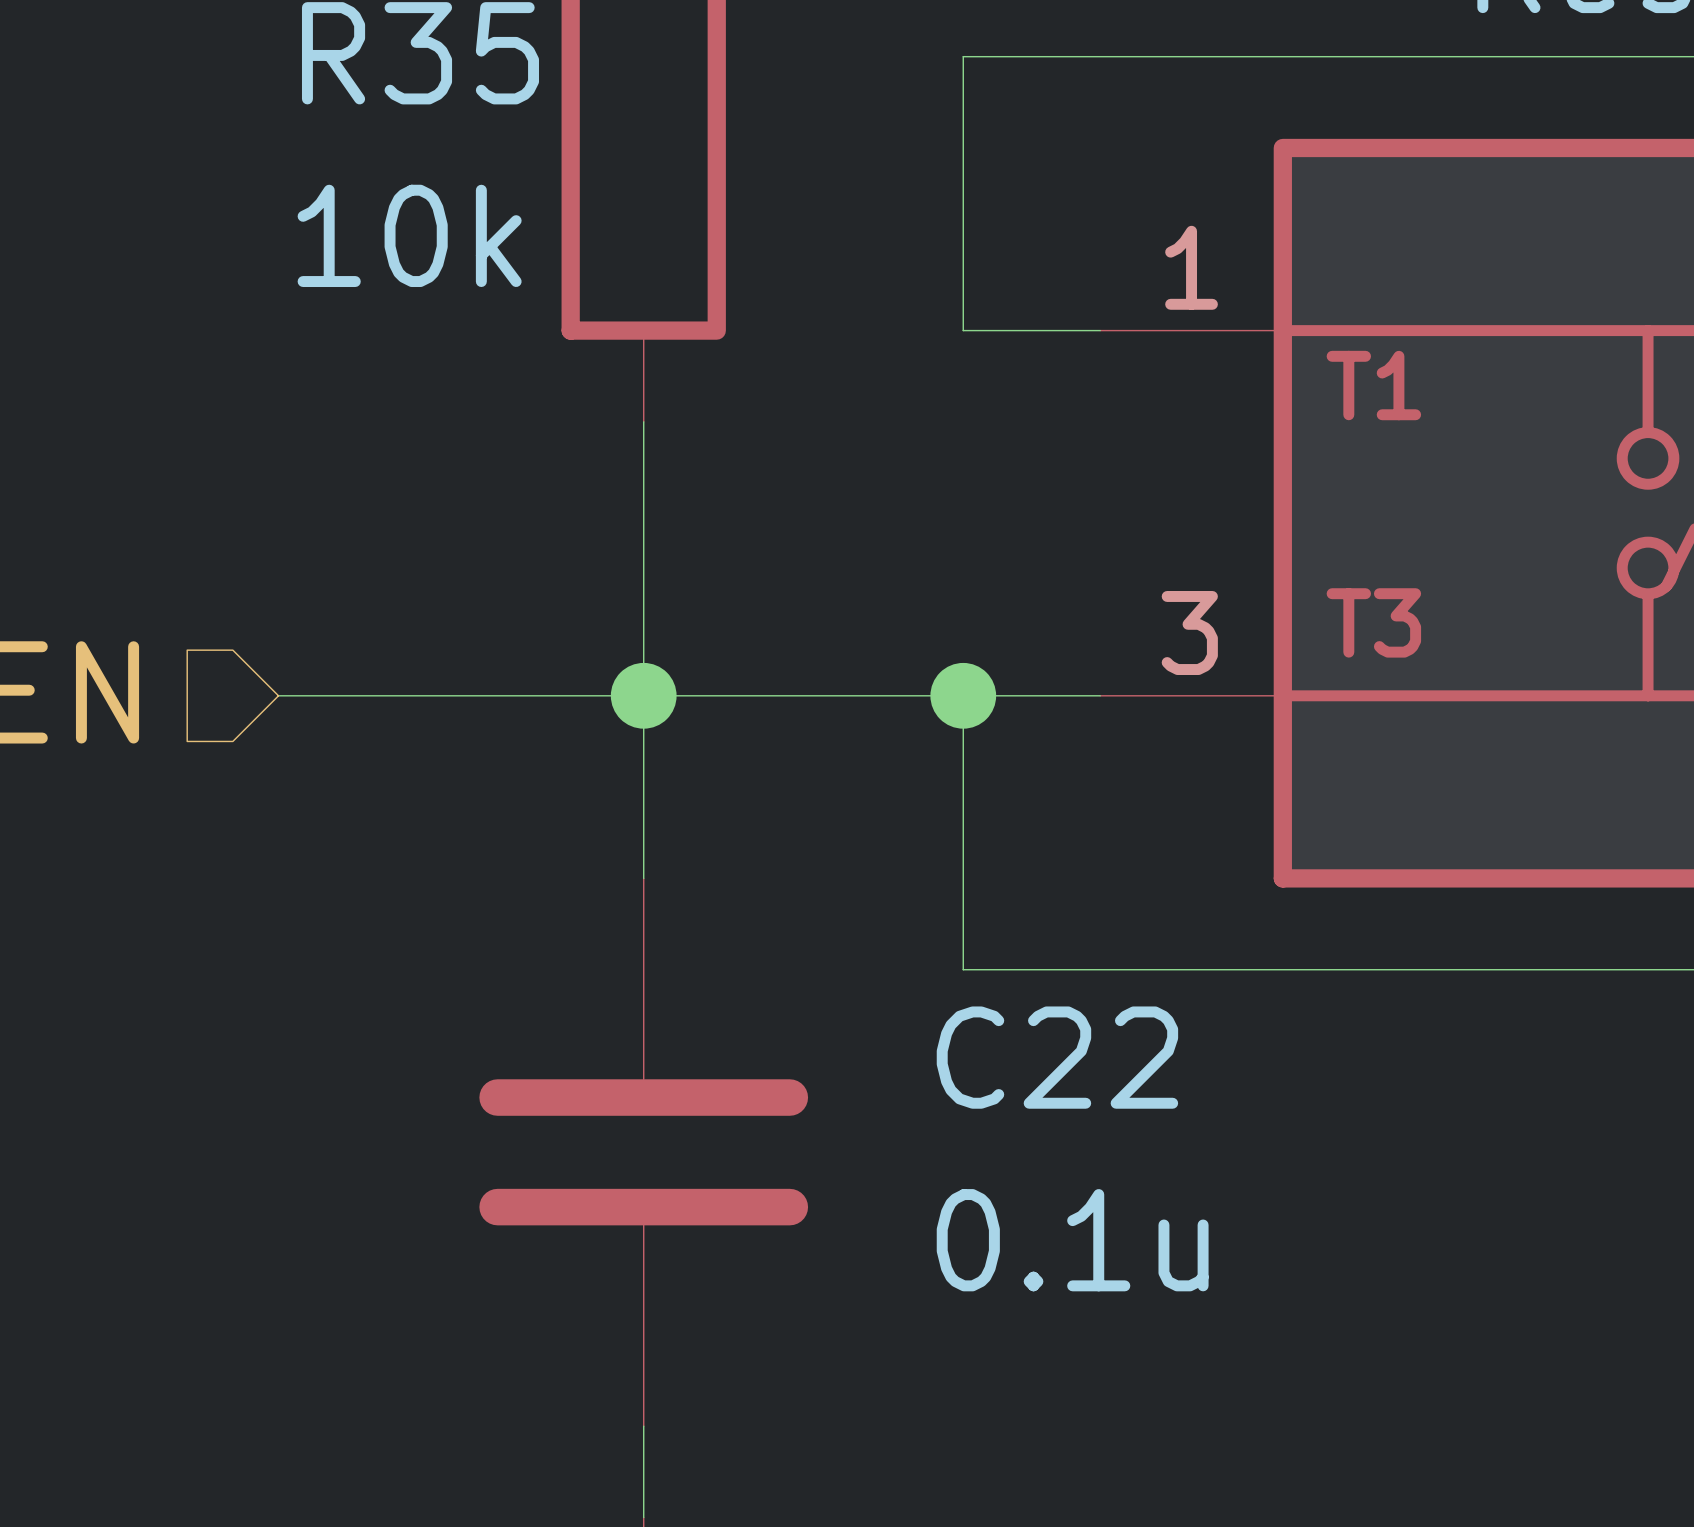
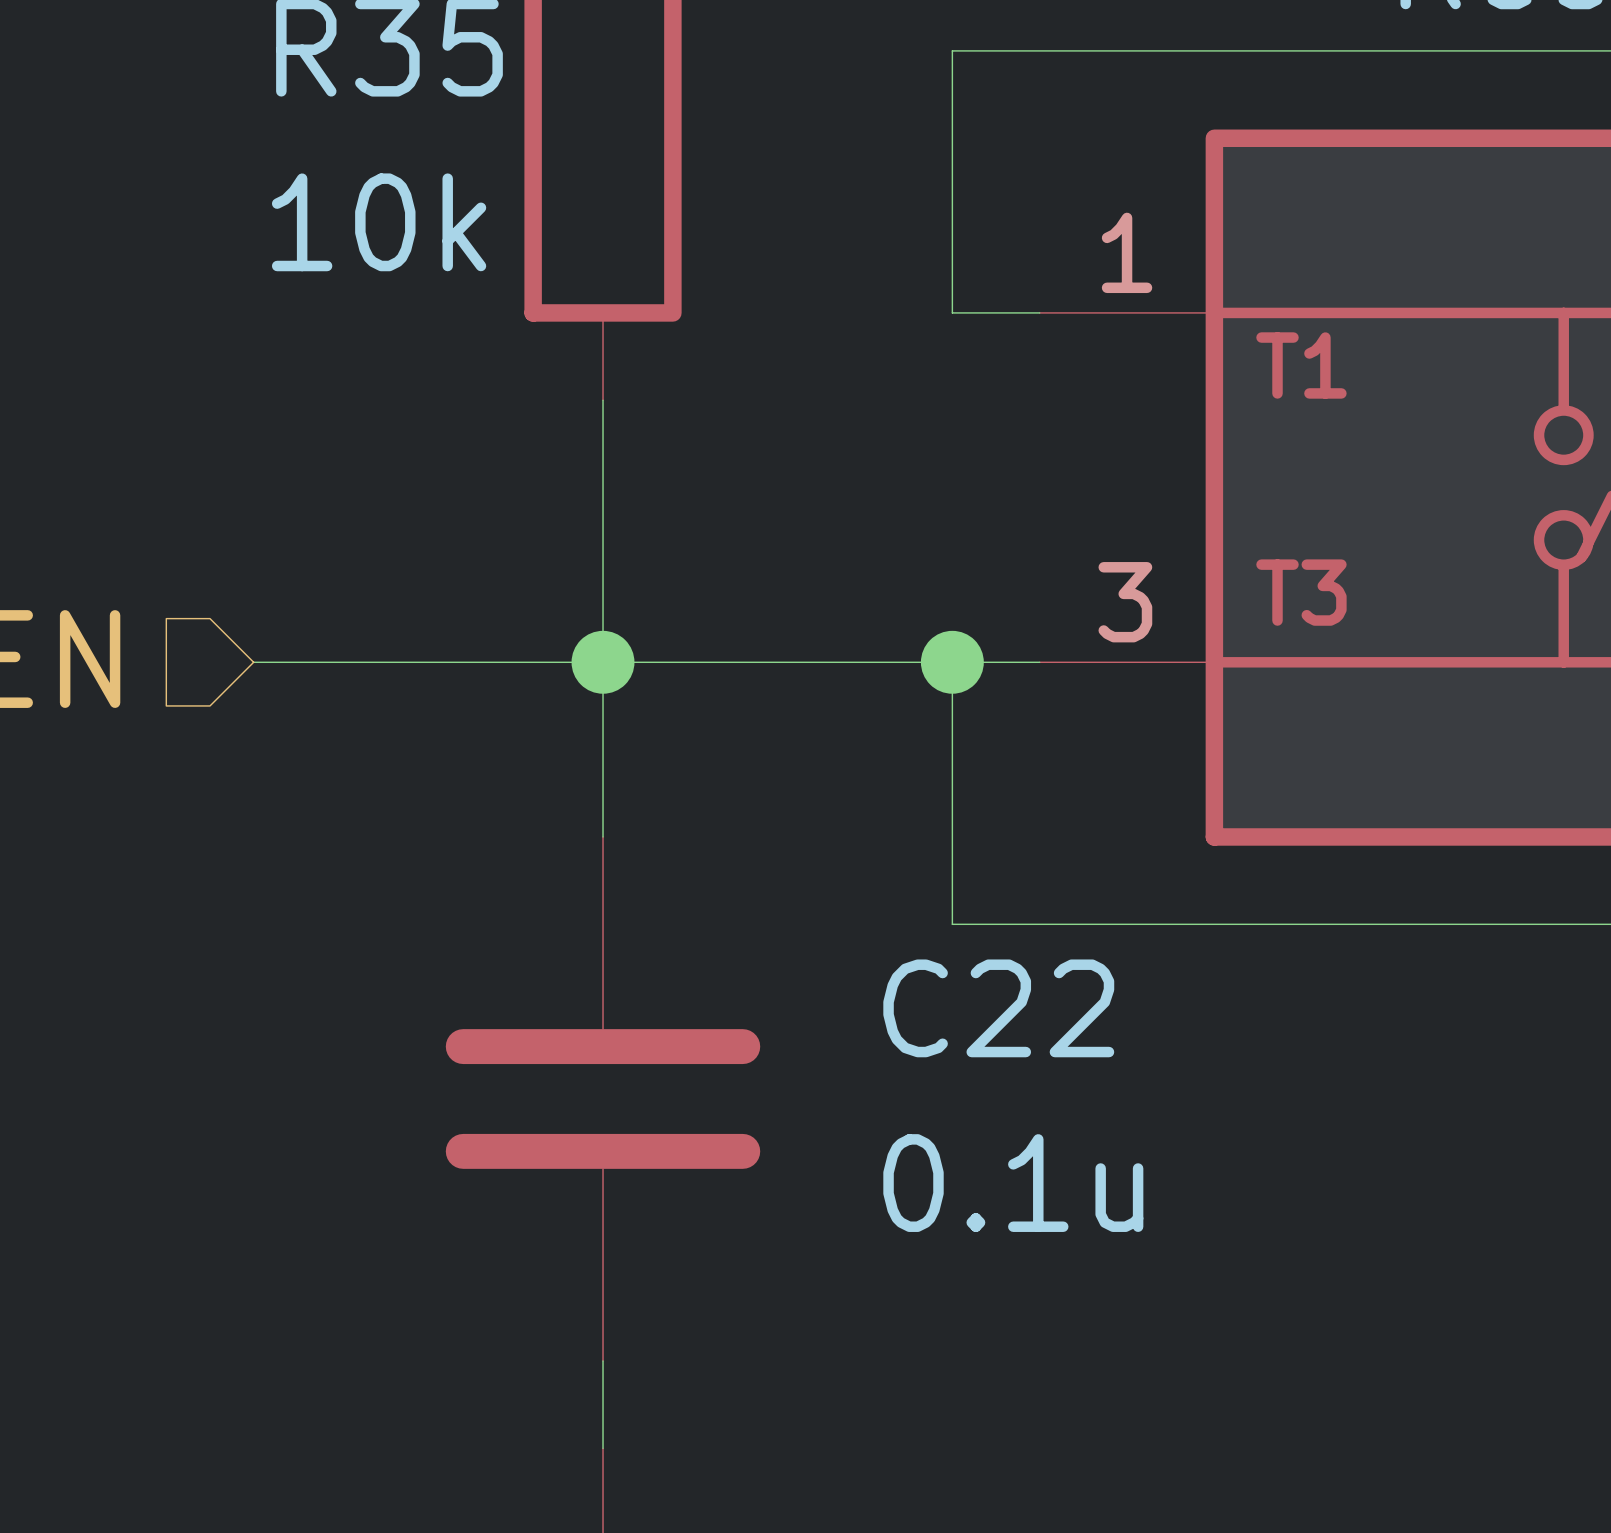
wire: (1008, 56) (963, 56) (963, 330) (1008, 330) -> (952, 50) (952, 312)
wire: (963, 695) (963, 969) (1008, 969) -> (952, 662) (952, 924)
junction position: (963, 695) -> (952, 662)

